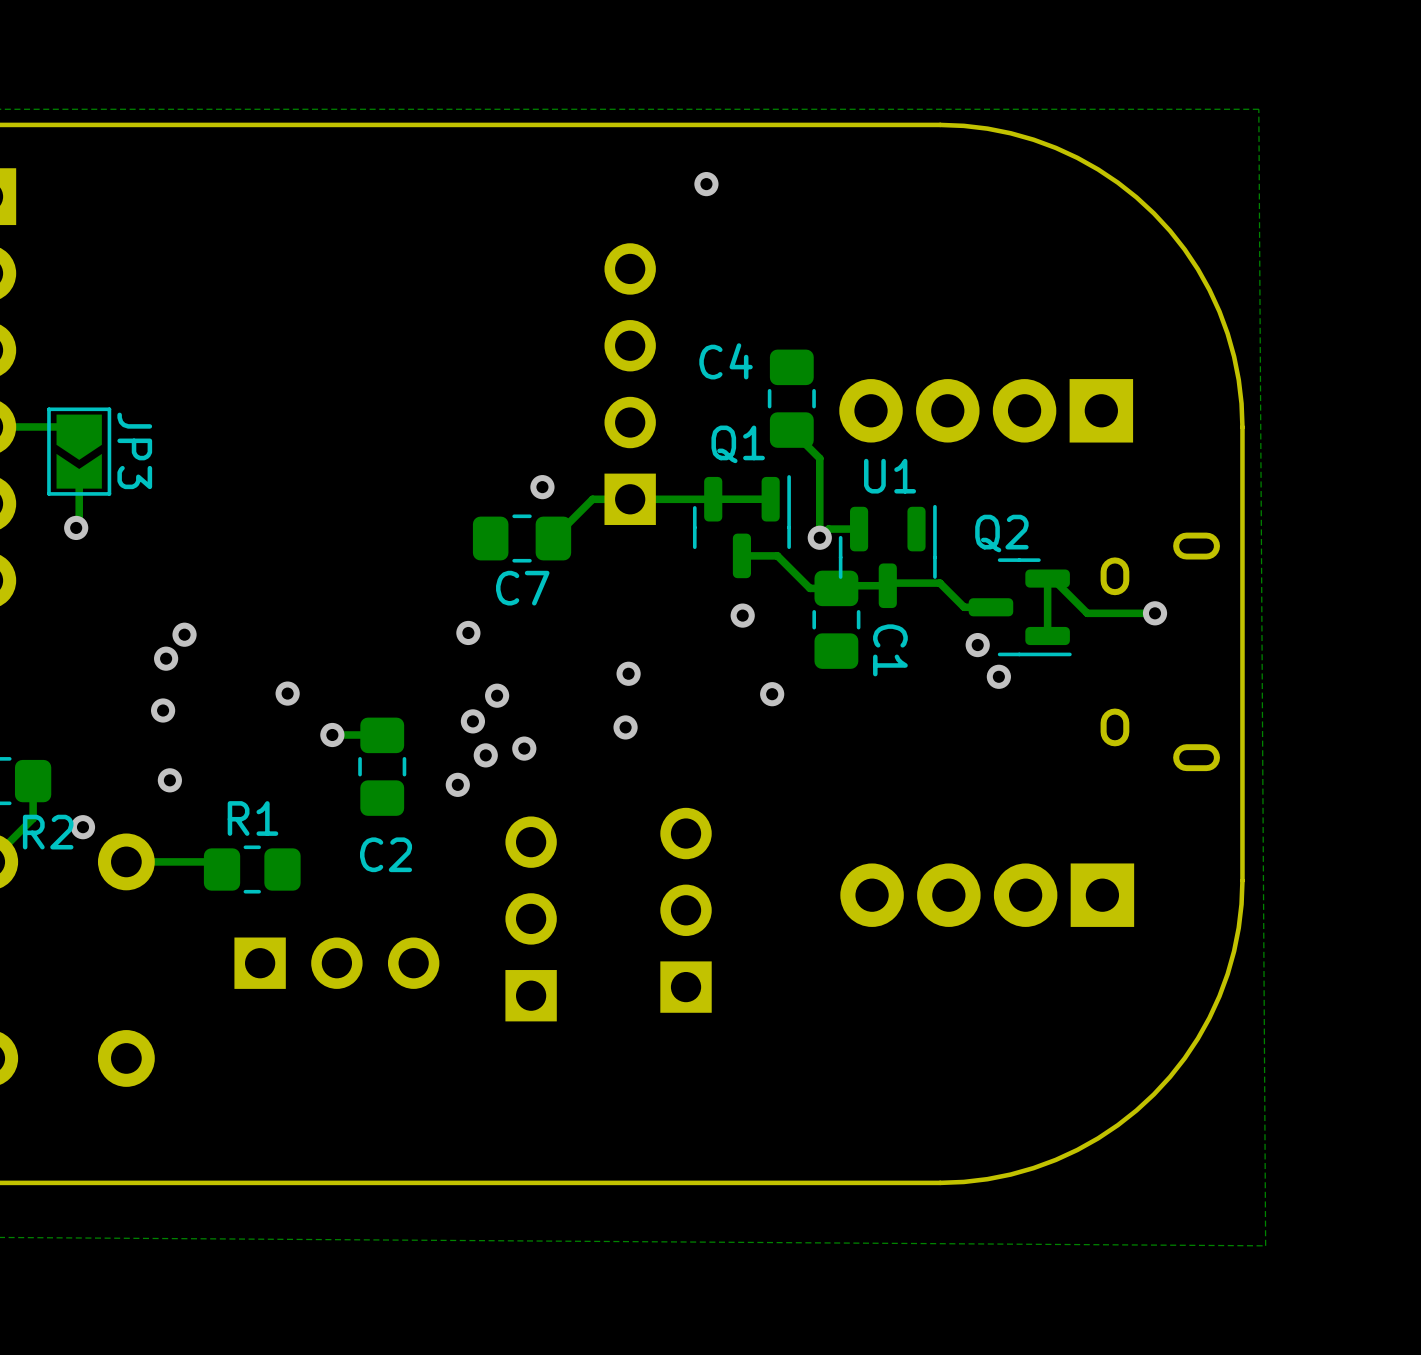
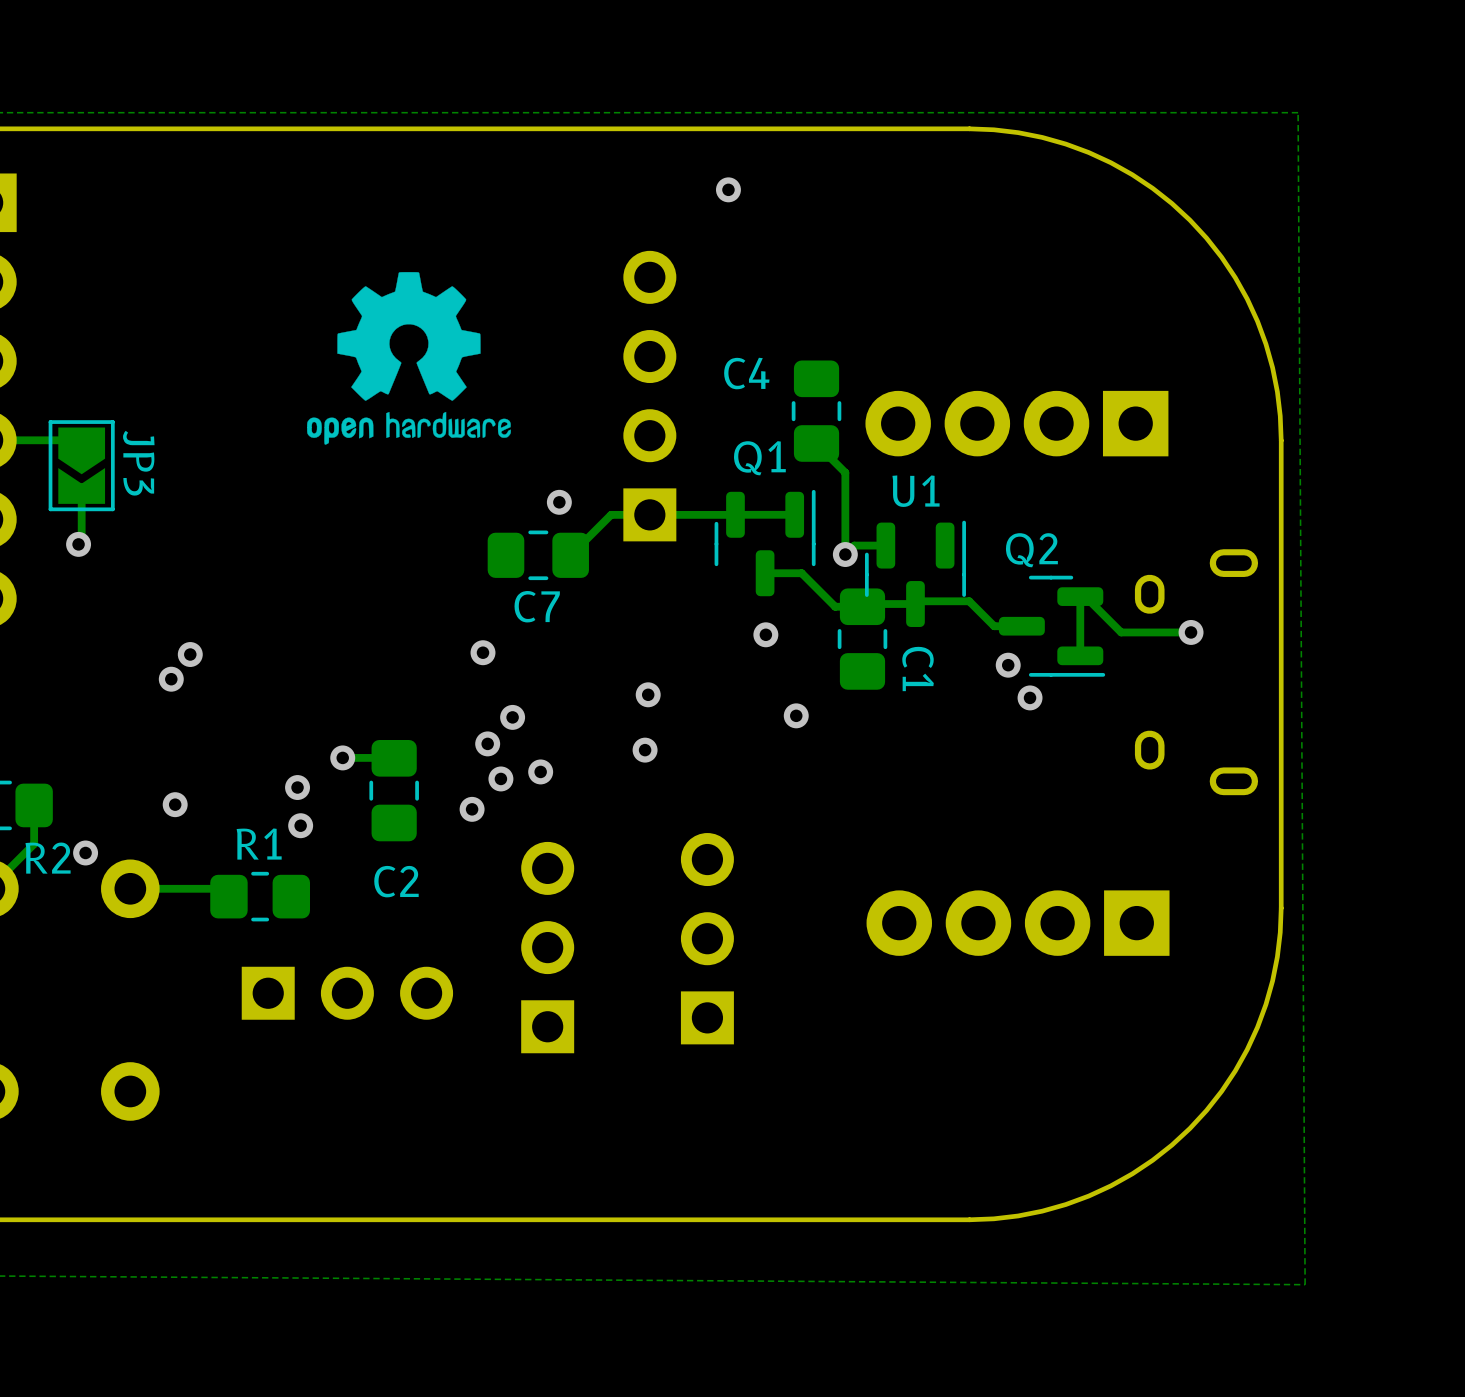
drawing: none -> [307, 272, 511, 445]
via: (287, 693) -> none
via: (163, 710) -> none
via: none -> (297, 787)
via: none -> (300, 825)

